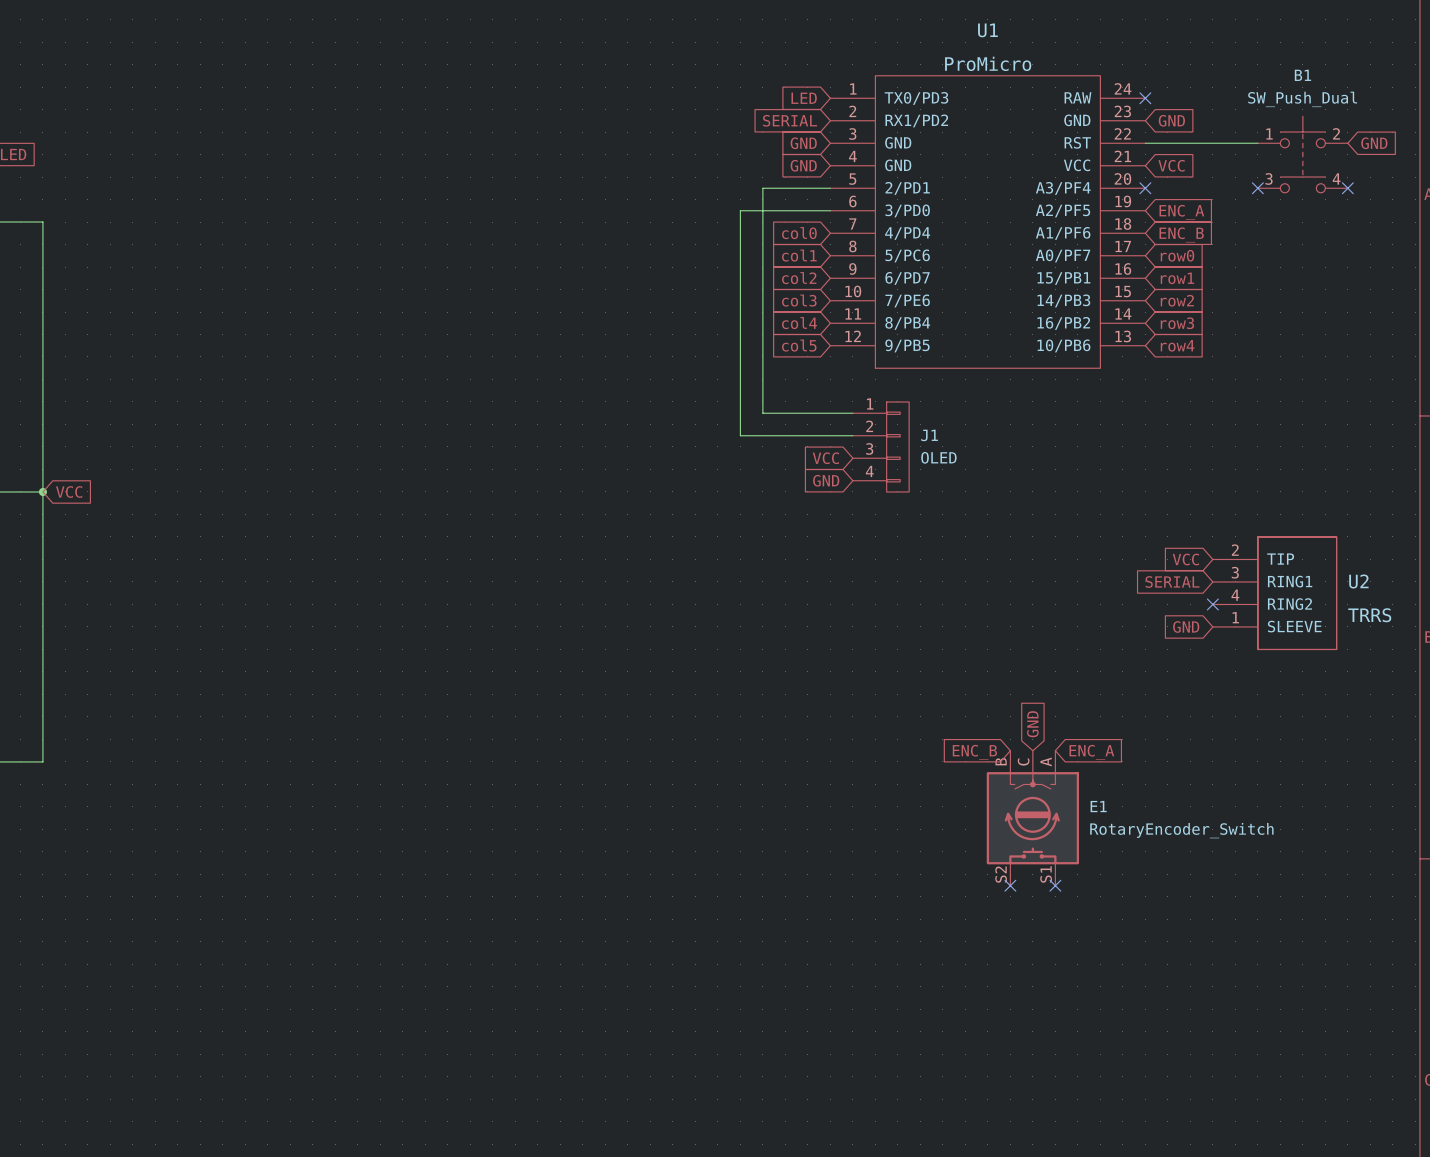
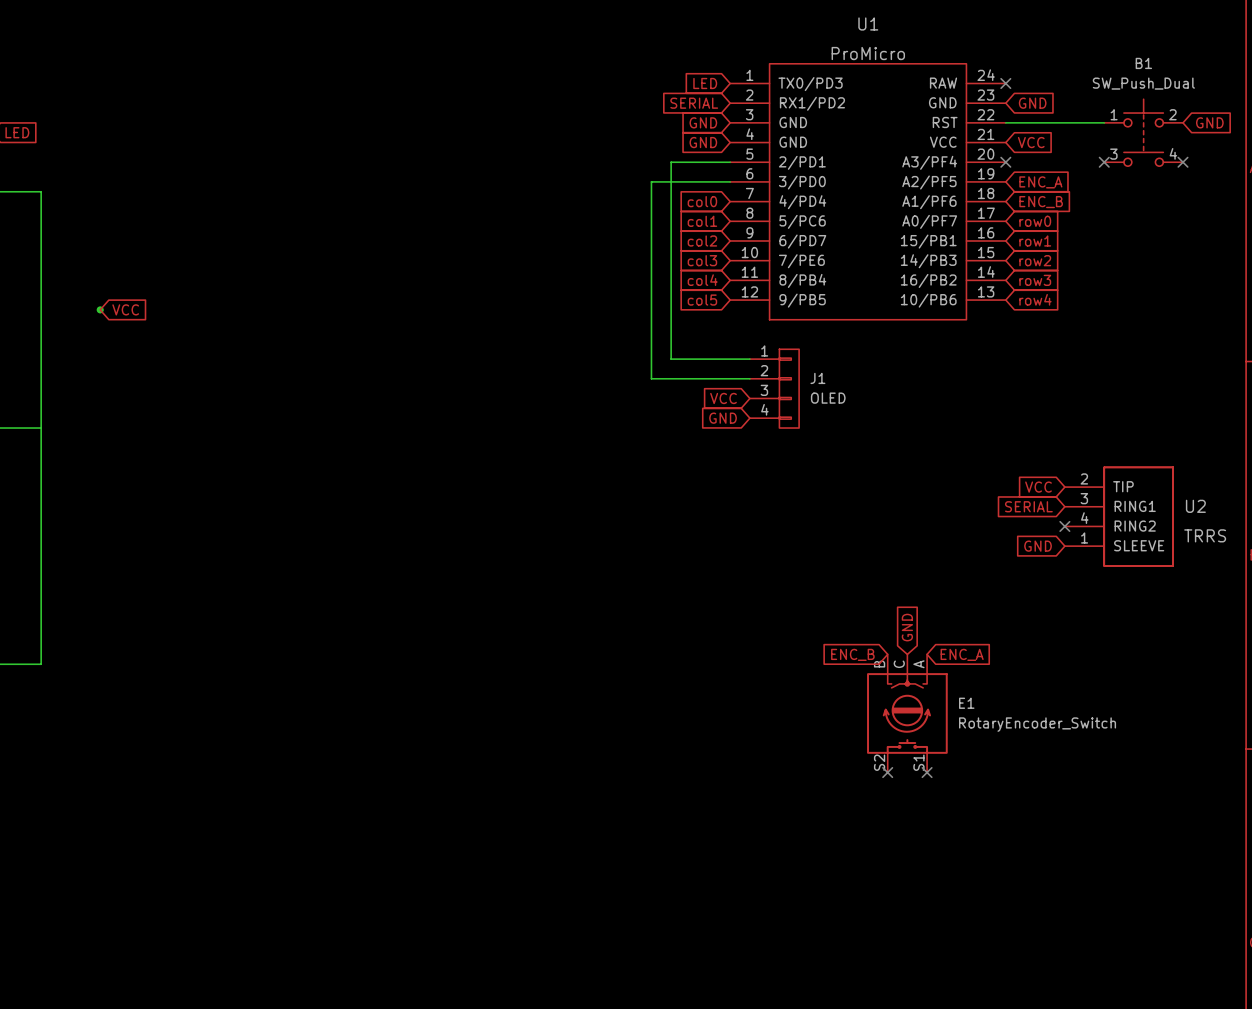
junction: none -> (100, 309)
junction: (42, 491) -> none
global label position: VCC (69, 491) -> VCC (125, 309)

